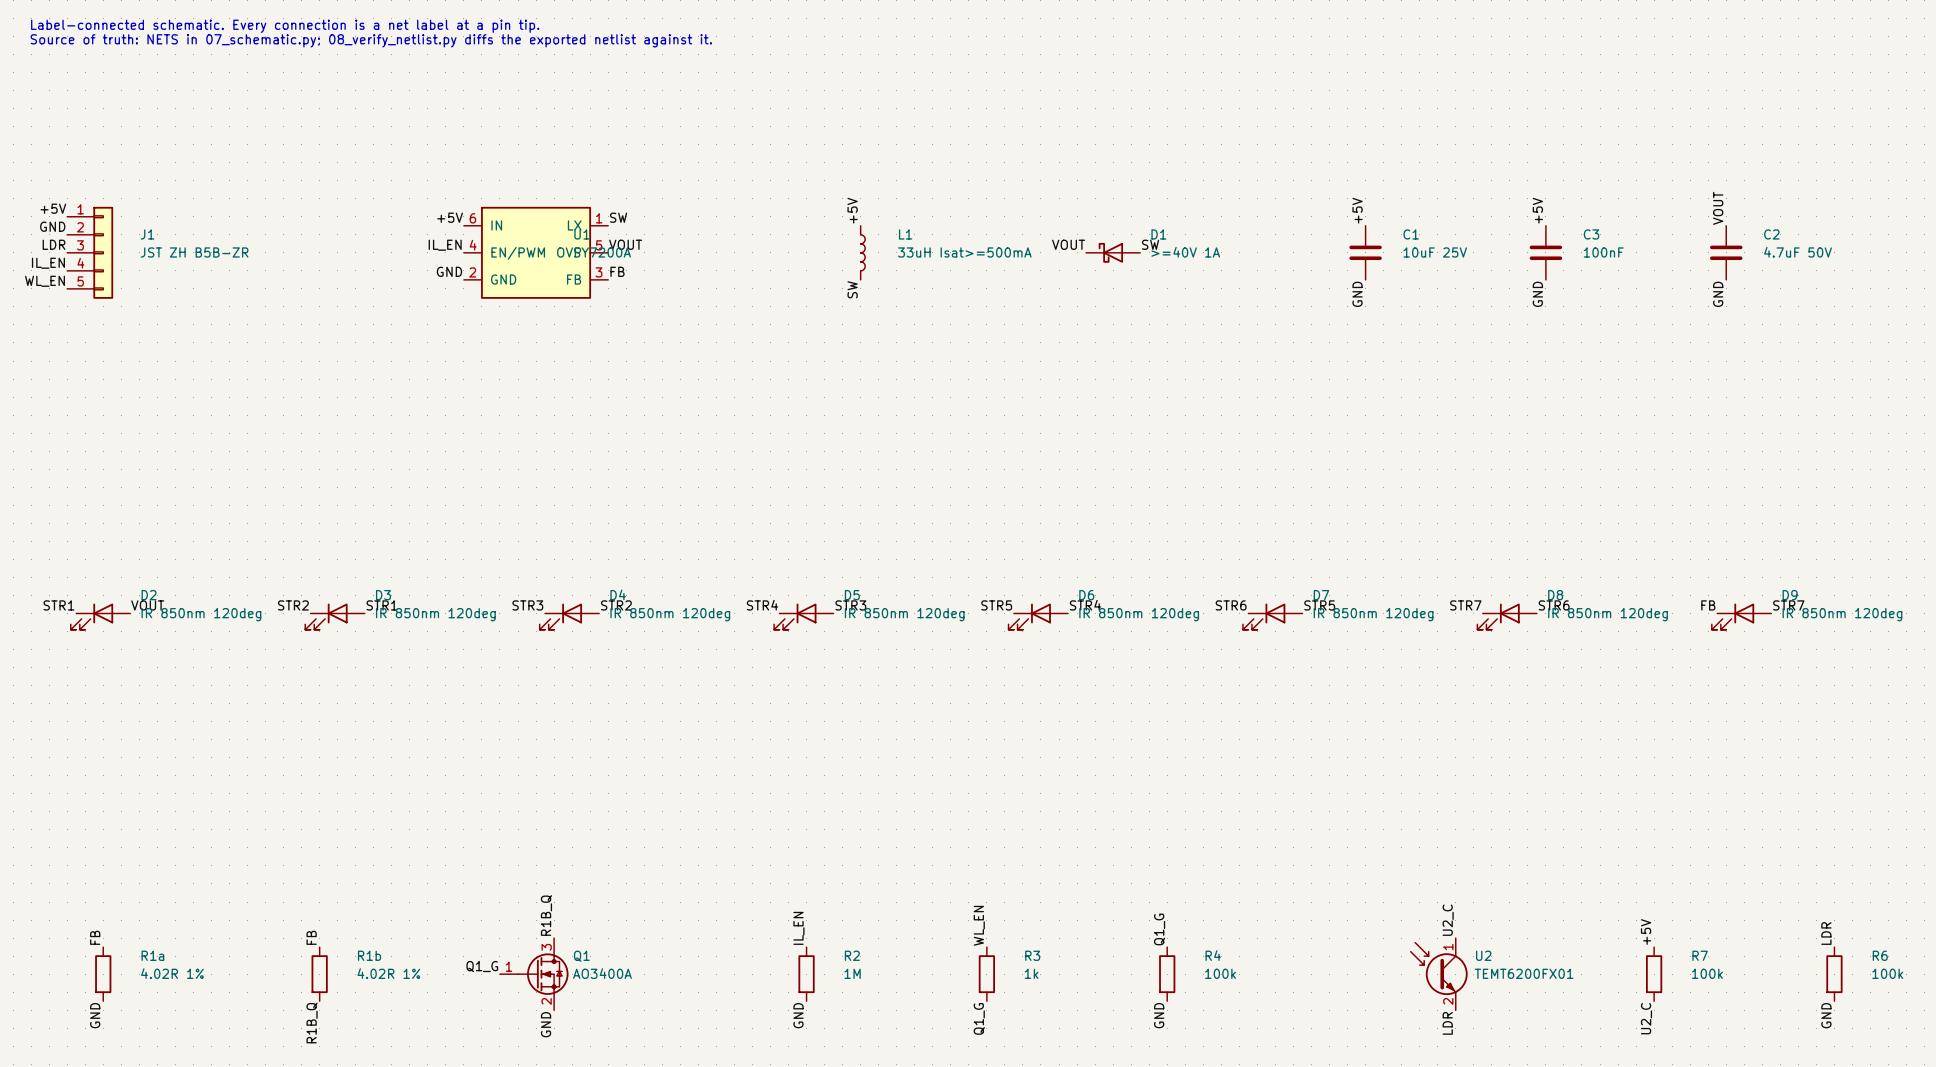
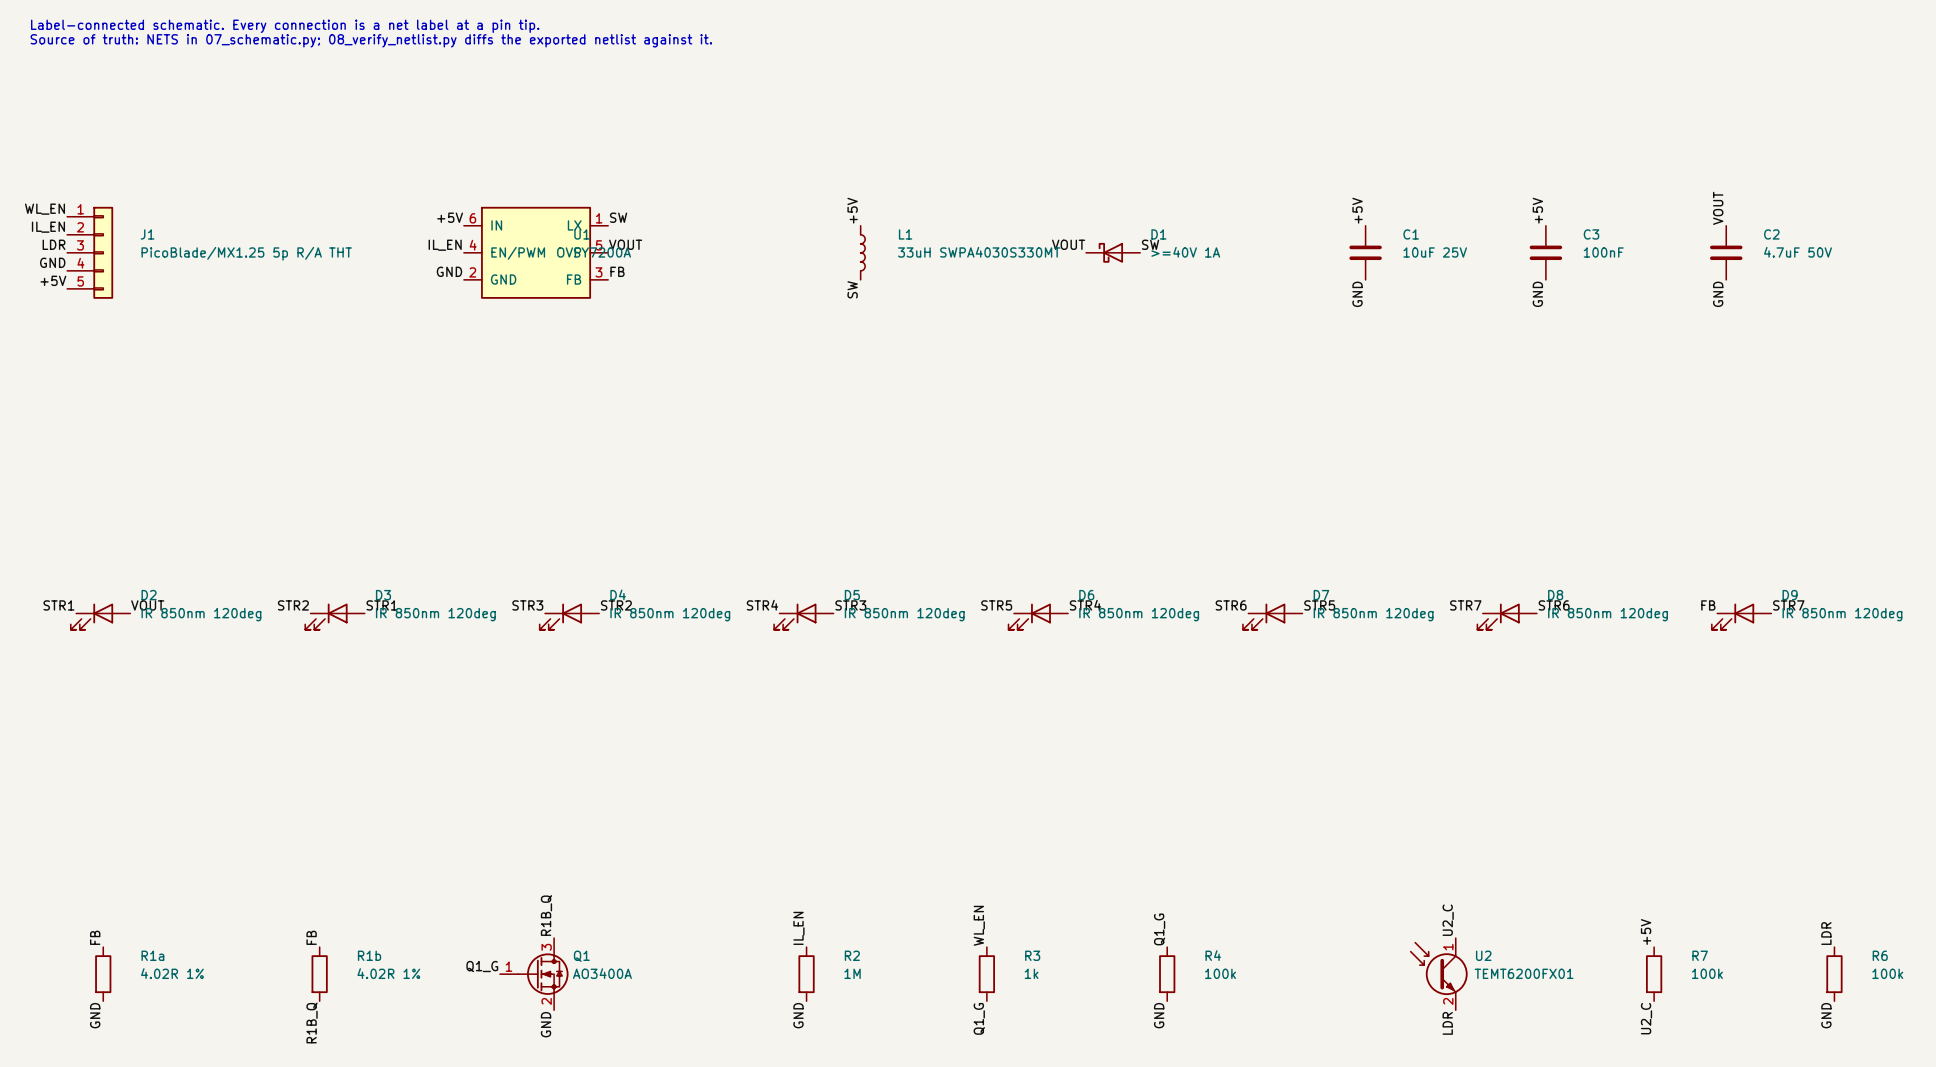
label: +5V (53, 208) -> WL_EN (45, 209)
label: GND (52, 226) -> IL_EN (48, 227)
J1 value: JST ZH B5B-ZR (194, 252) -> PicoBlade/MX1.25 5p R/A THT (246, 253)
L1 value: 33uH Isat>=500mA (964, 252) -> 33uH SWPA4030S330MT (979, 252)
label: IL_EN (48, 263) -> GND (52, 262)
label: WL_EN (45, 281) -> +5V (53, 280)

